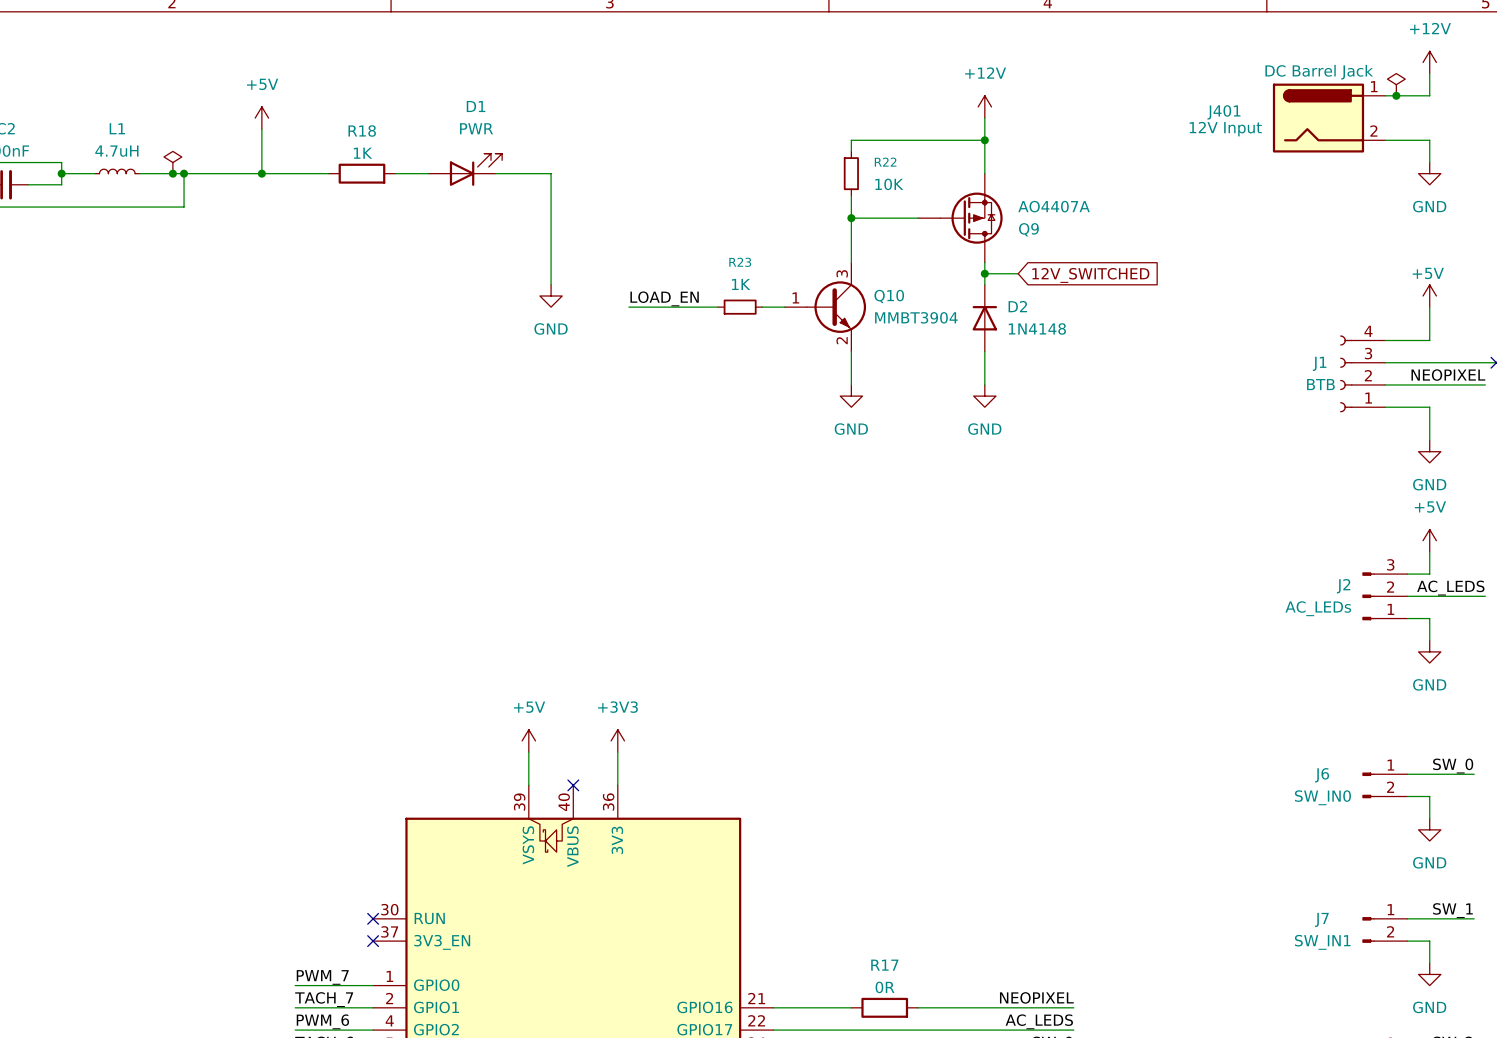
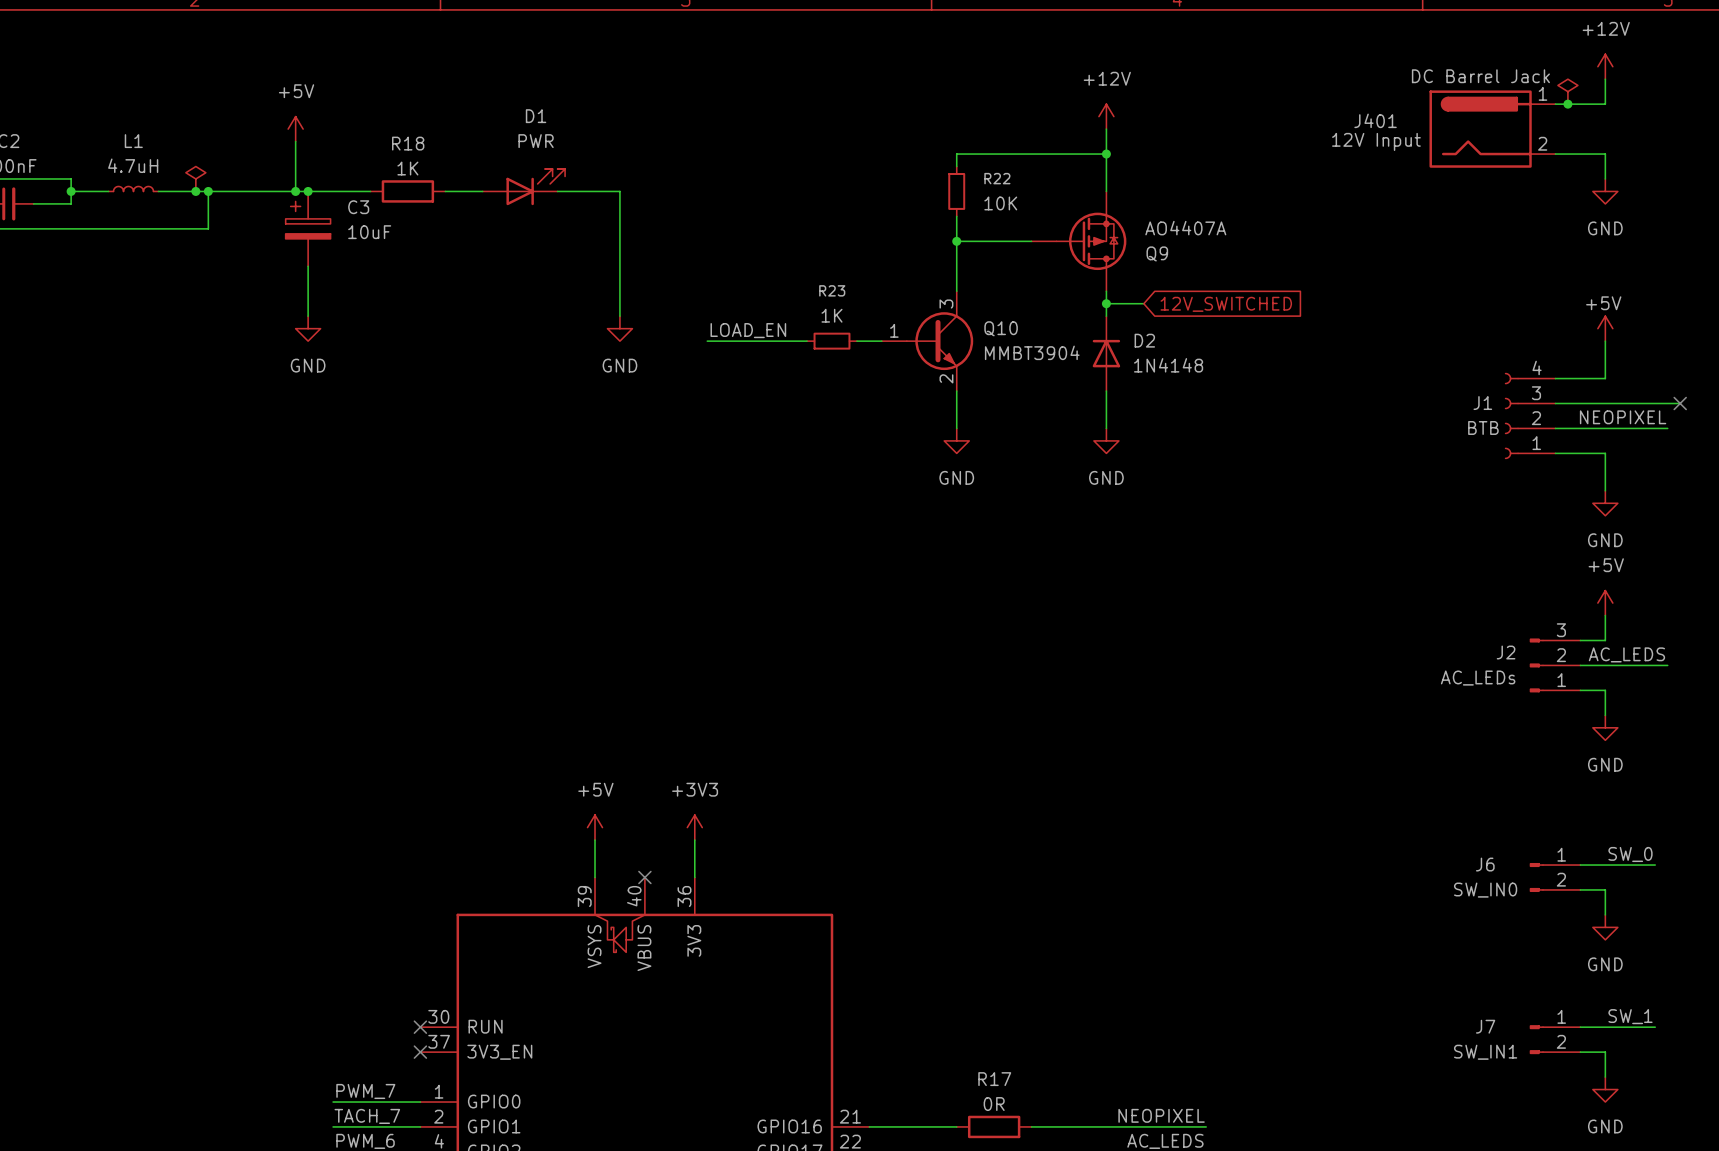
junction: none -> (308, 191)
C3: none -> 10uF (308, 228)
wire: none -> (308, 266) (308, 316)
power symbol: none -> GND (308, 328)

